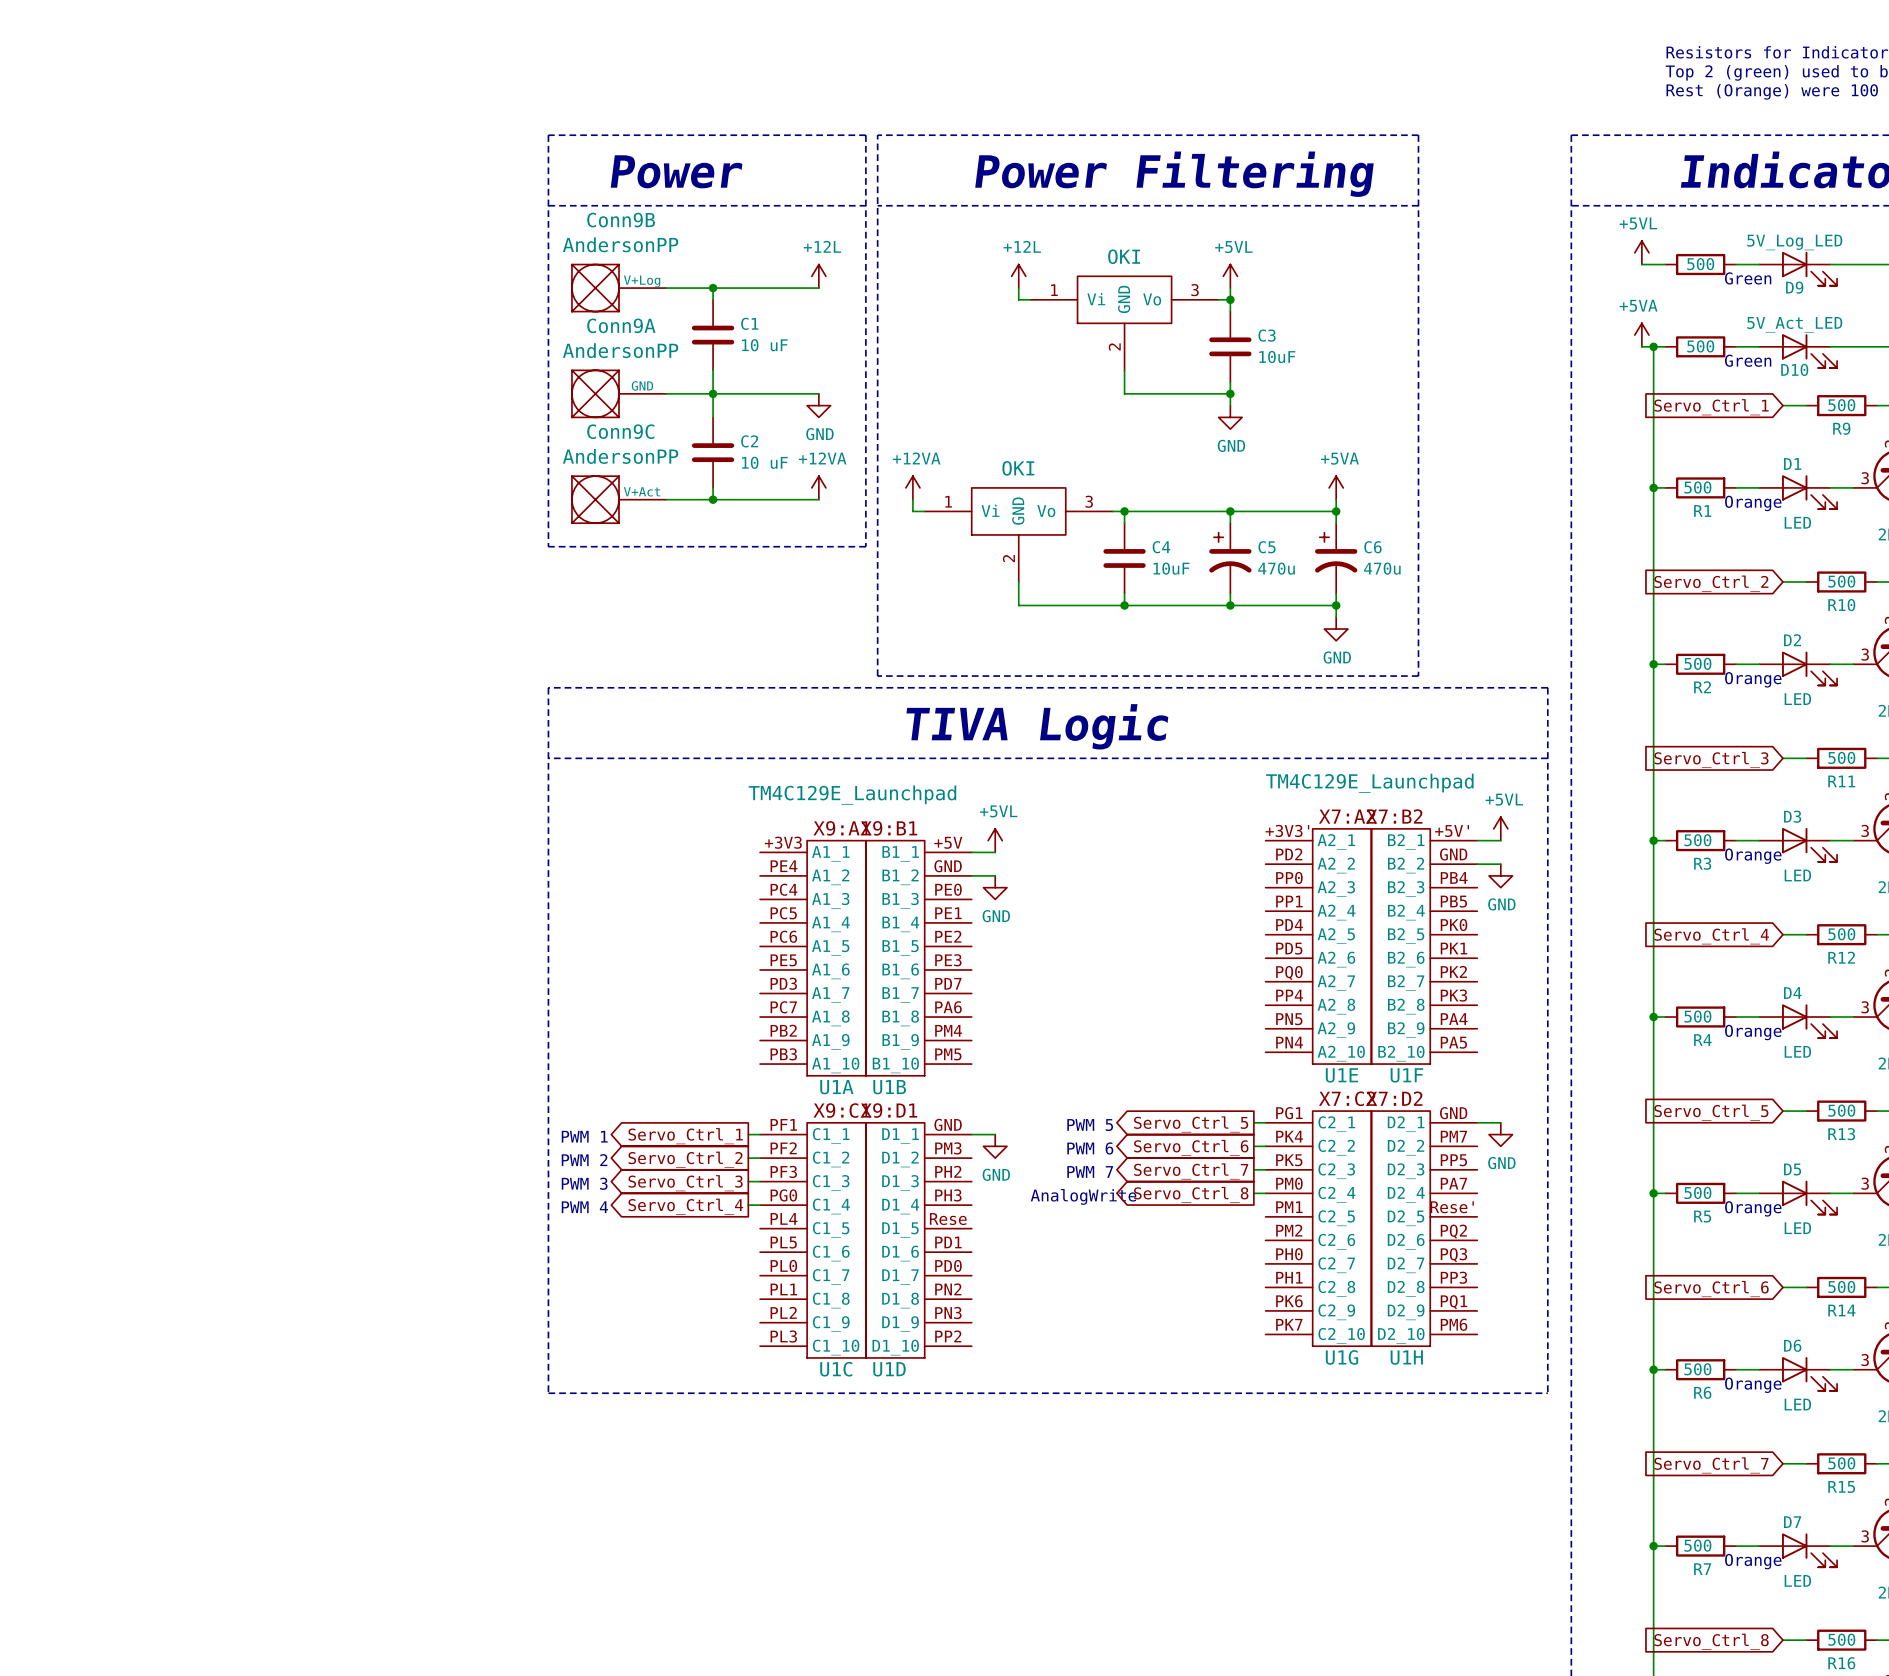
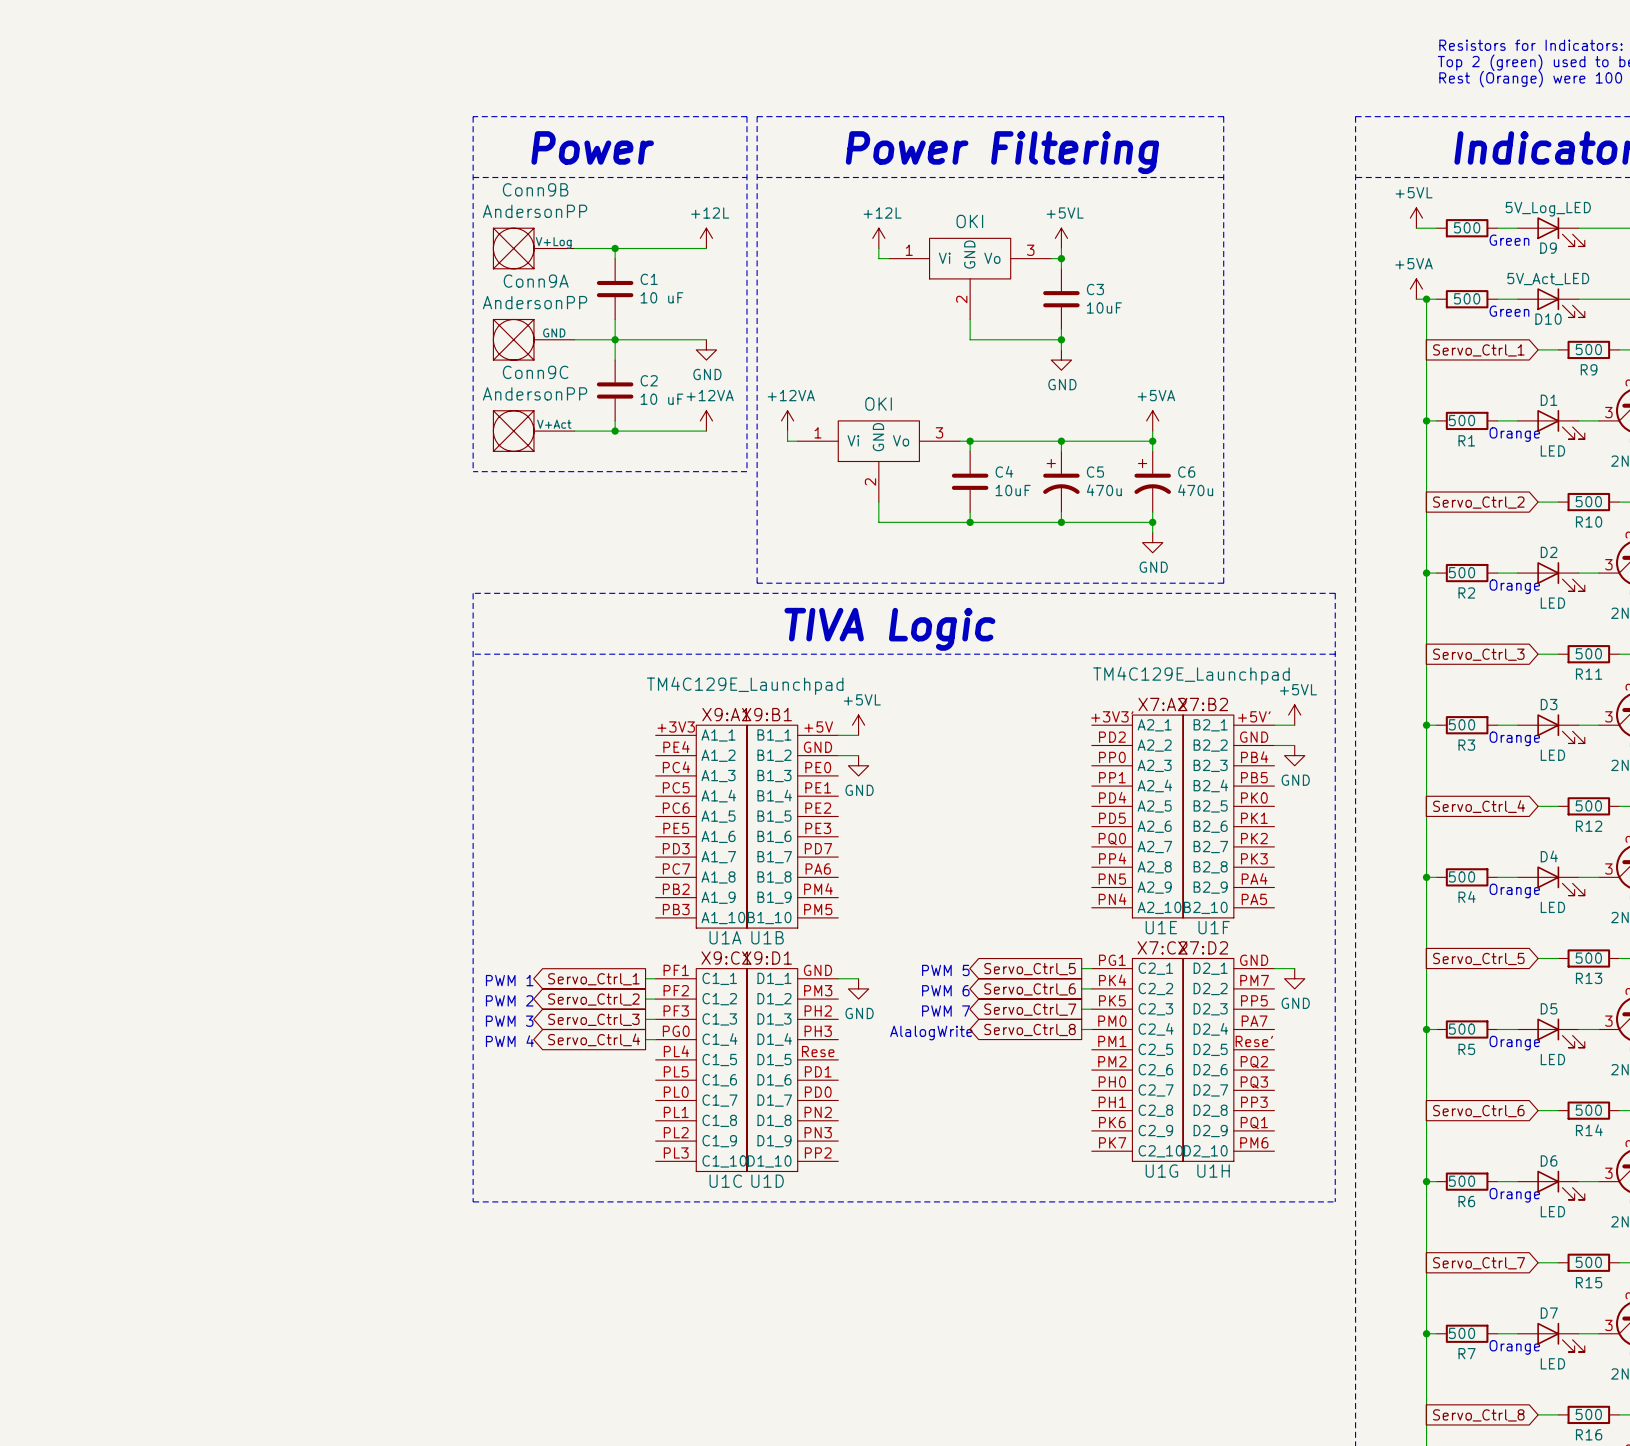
text: AnalogWrite (1083, 1196) -> AlalogWrite (931, 1033)

